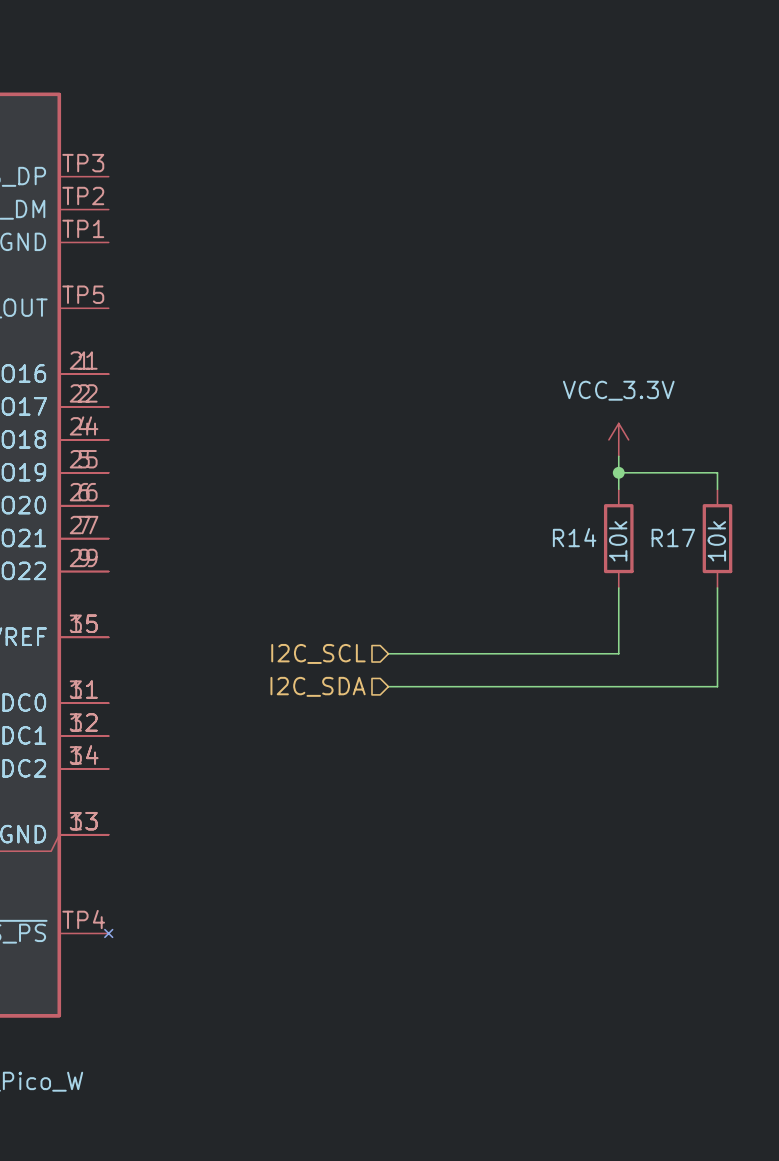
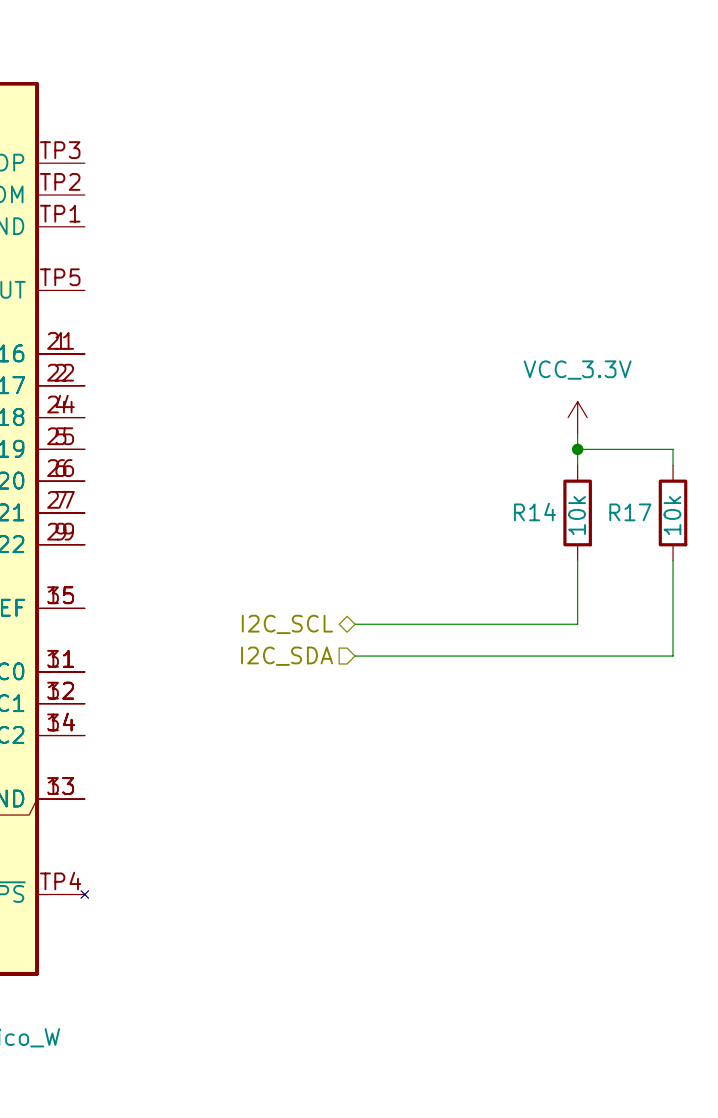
hierarchical label shape: input (318, 653) -> bidirectional (287, 624)

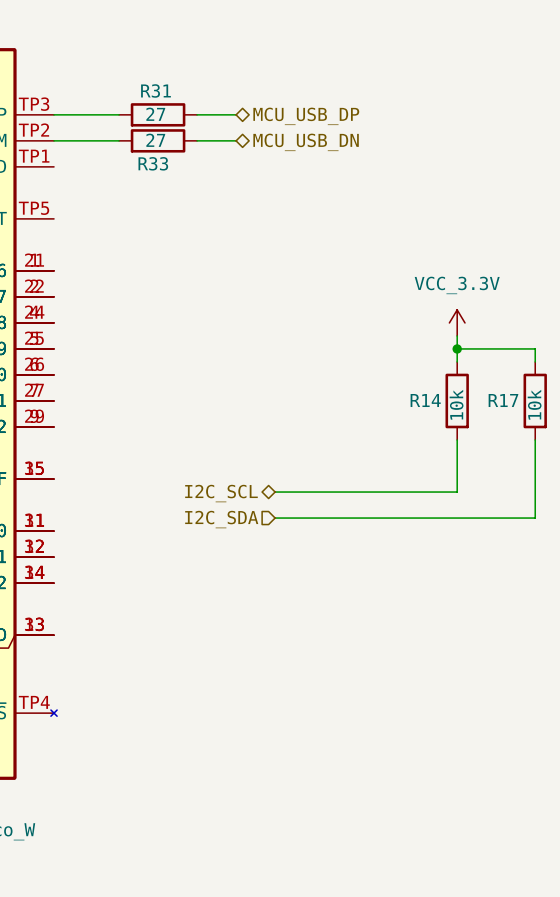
wire: none -> (54, 114) (119, 114)
R31: none -> 27 (158, 114)
wire: none -> (197, 114) (236, 114)
hierarchical label: none -> MCU_USB_DP (306, 116)
wire: none -> (54, 140) (119, 140)
R33: none -> 27 (158, 140)
wire: none -> (197, 140) (236, 140)
hierarchical label: none -> MCU_USB_DN (306, 142)

